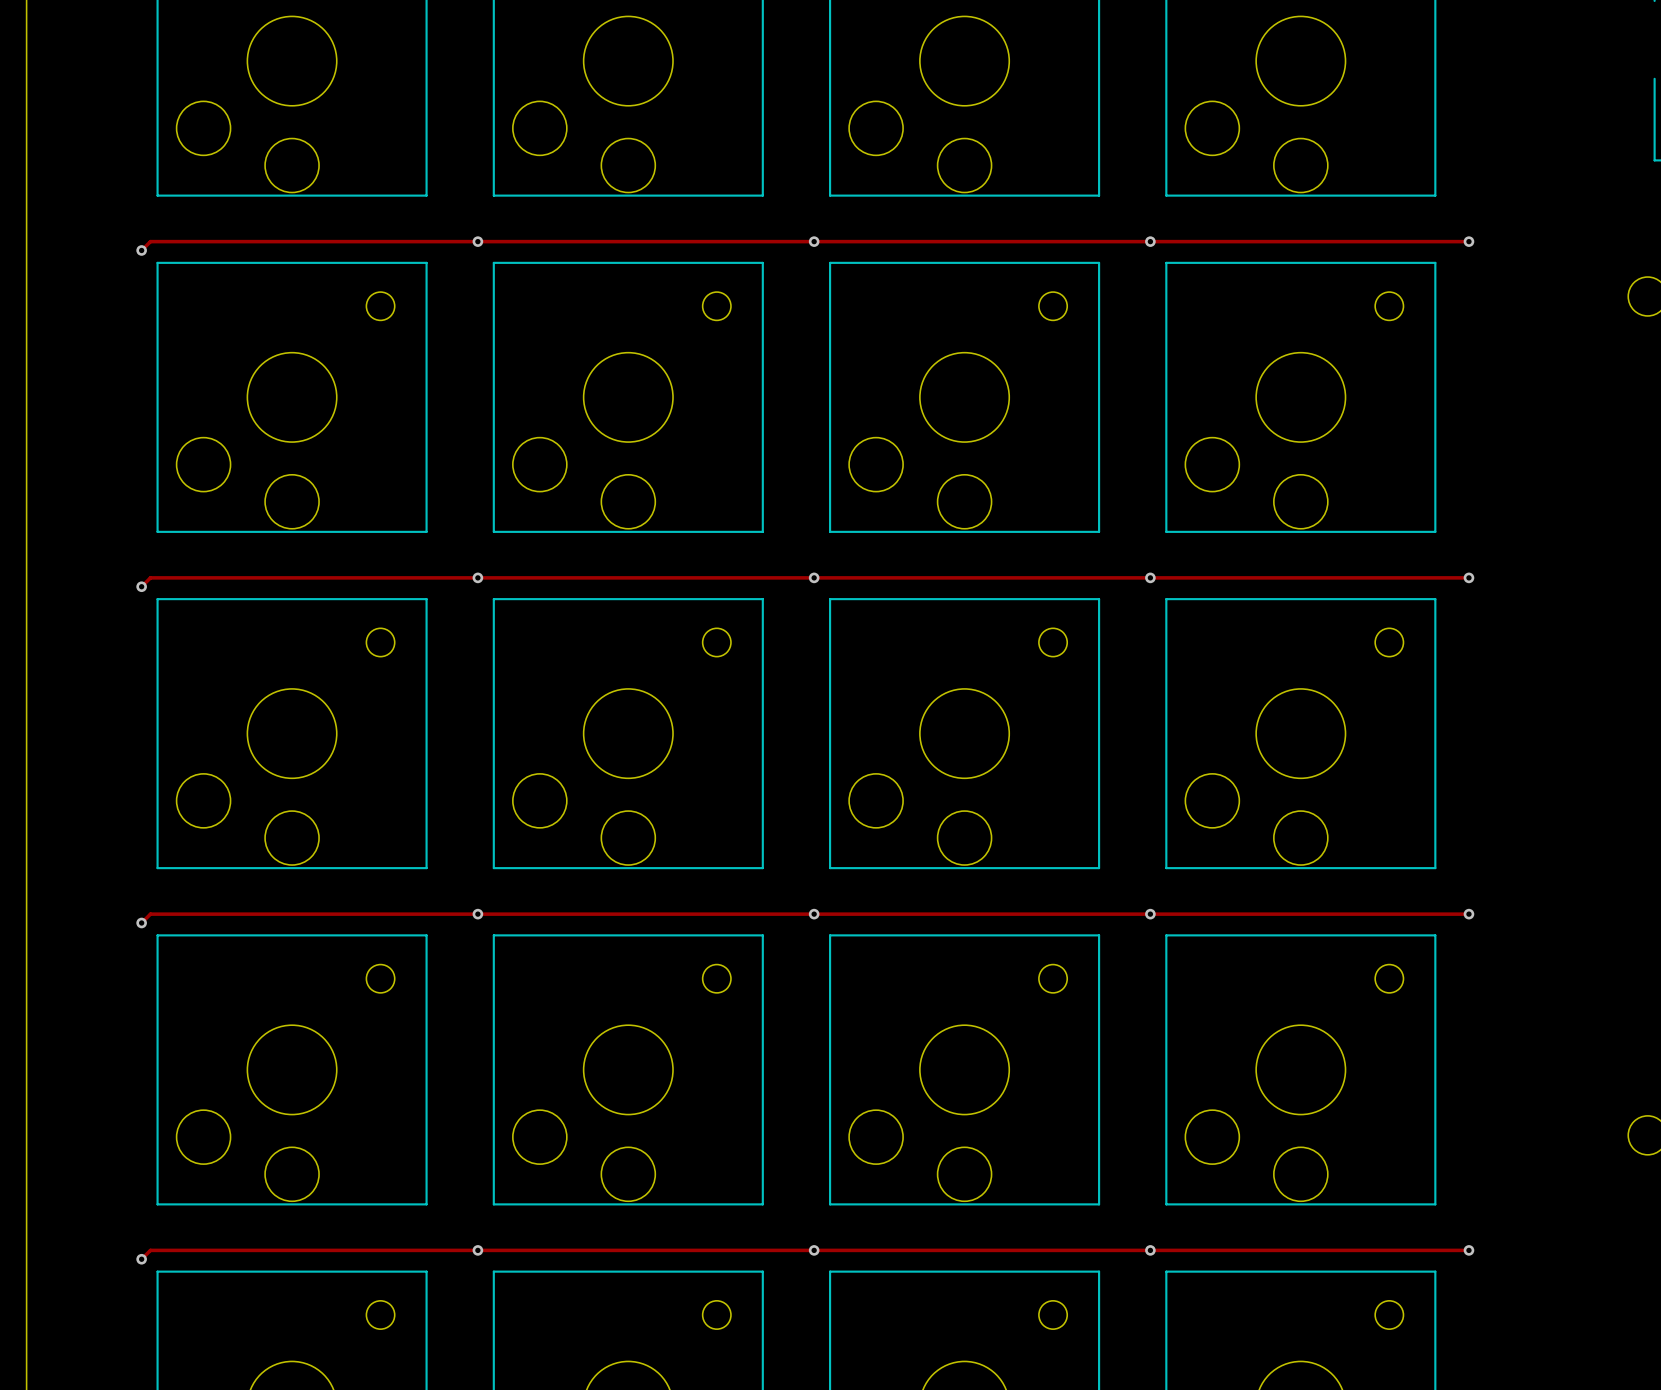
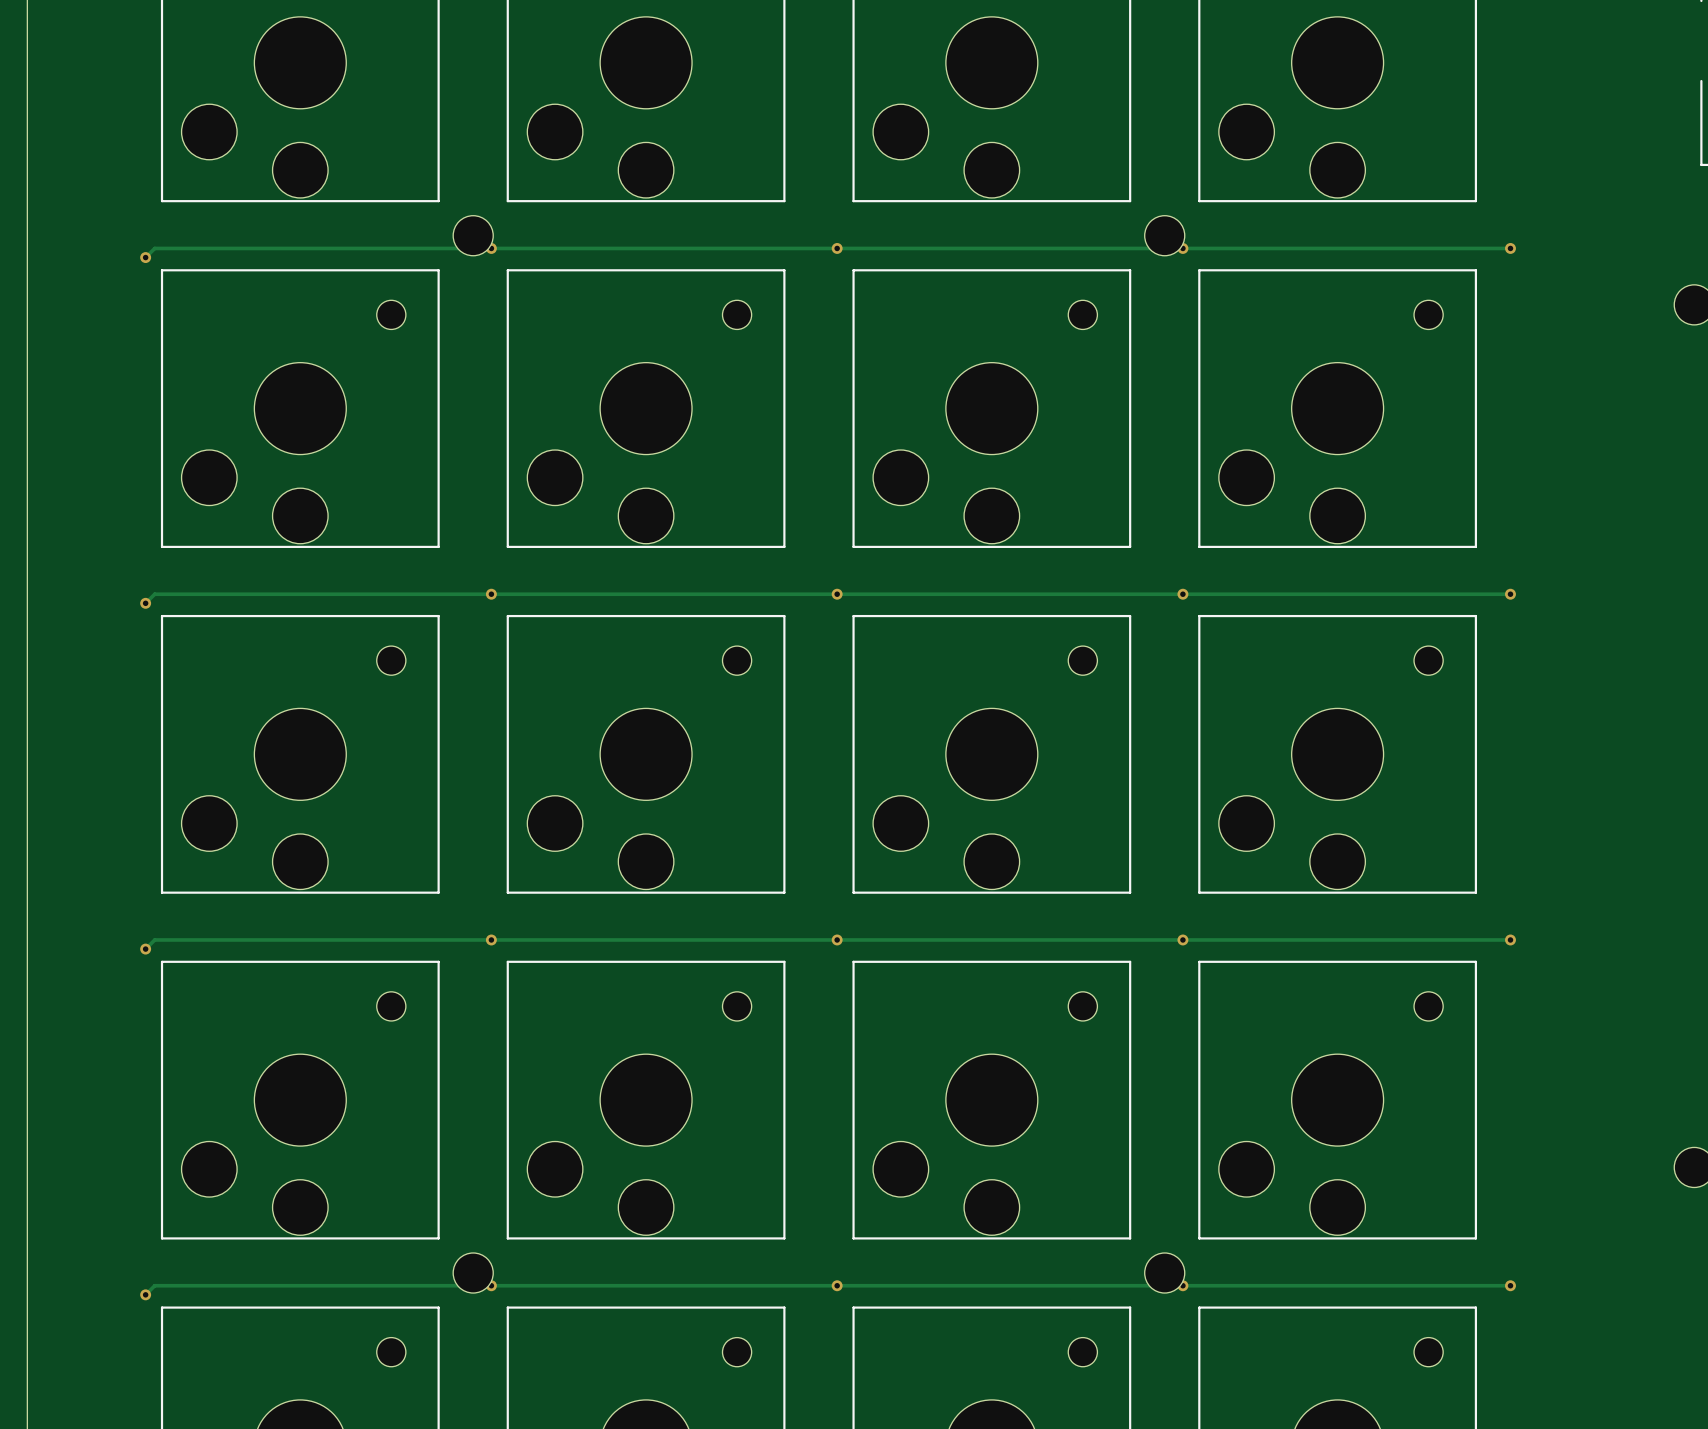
part: none -> (473, 235)
part: none -> (1164, 235)
part: none -> (473, 1273)
part: none -> (1164, 1273)

